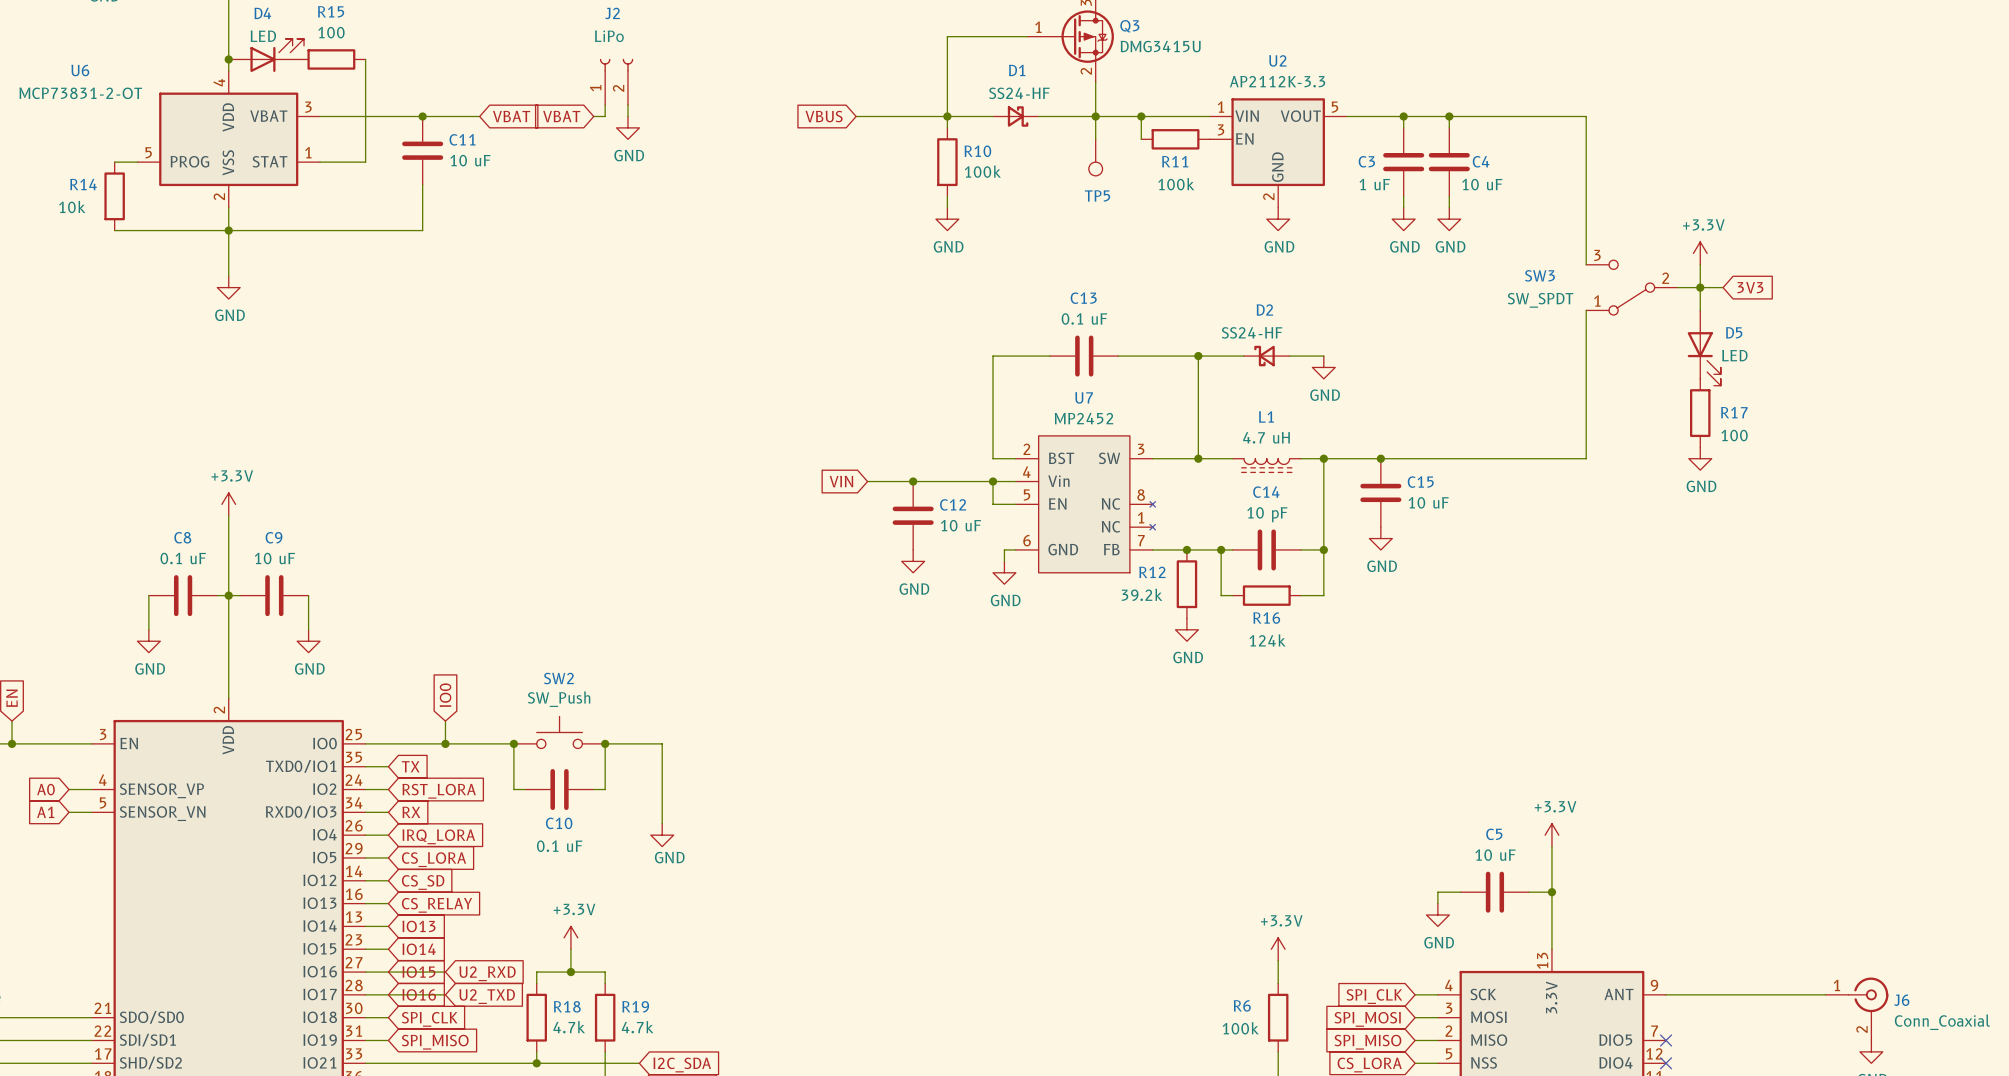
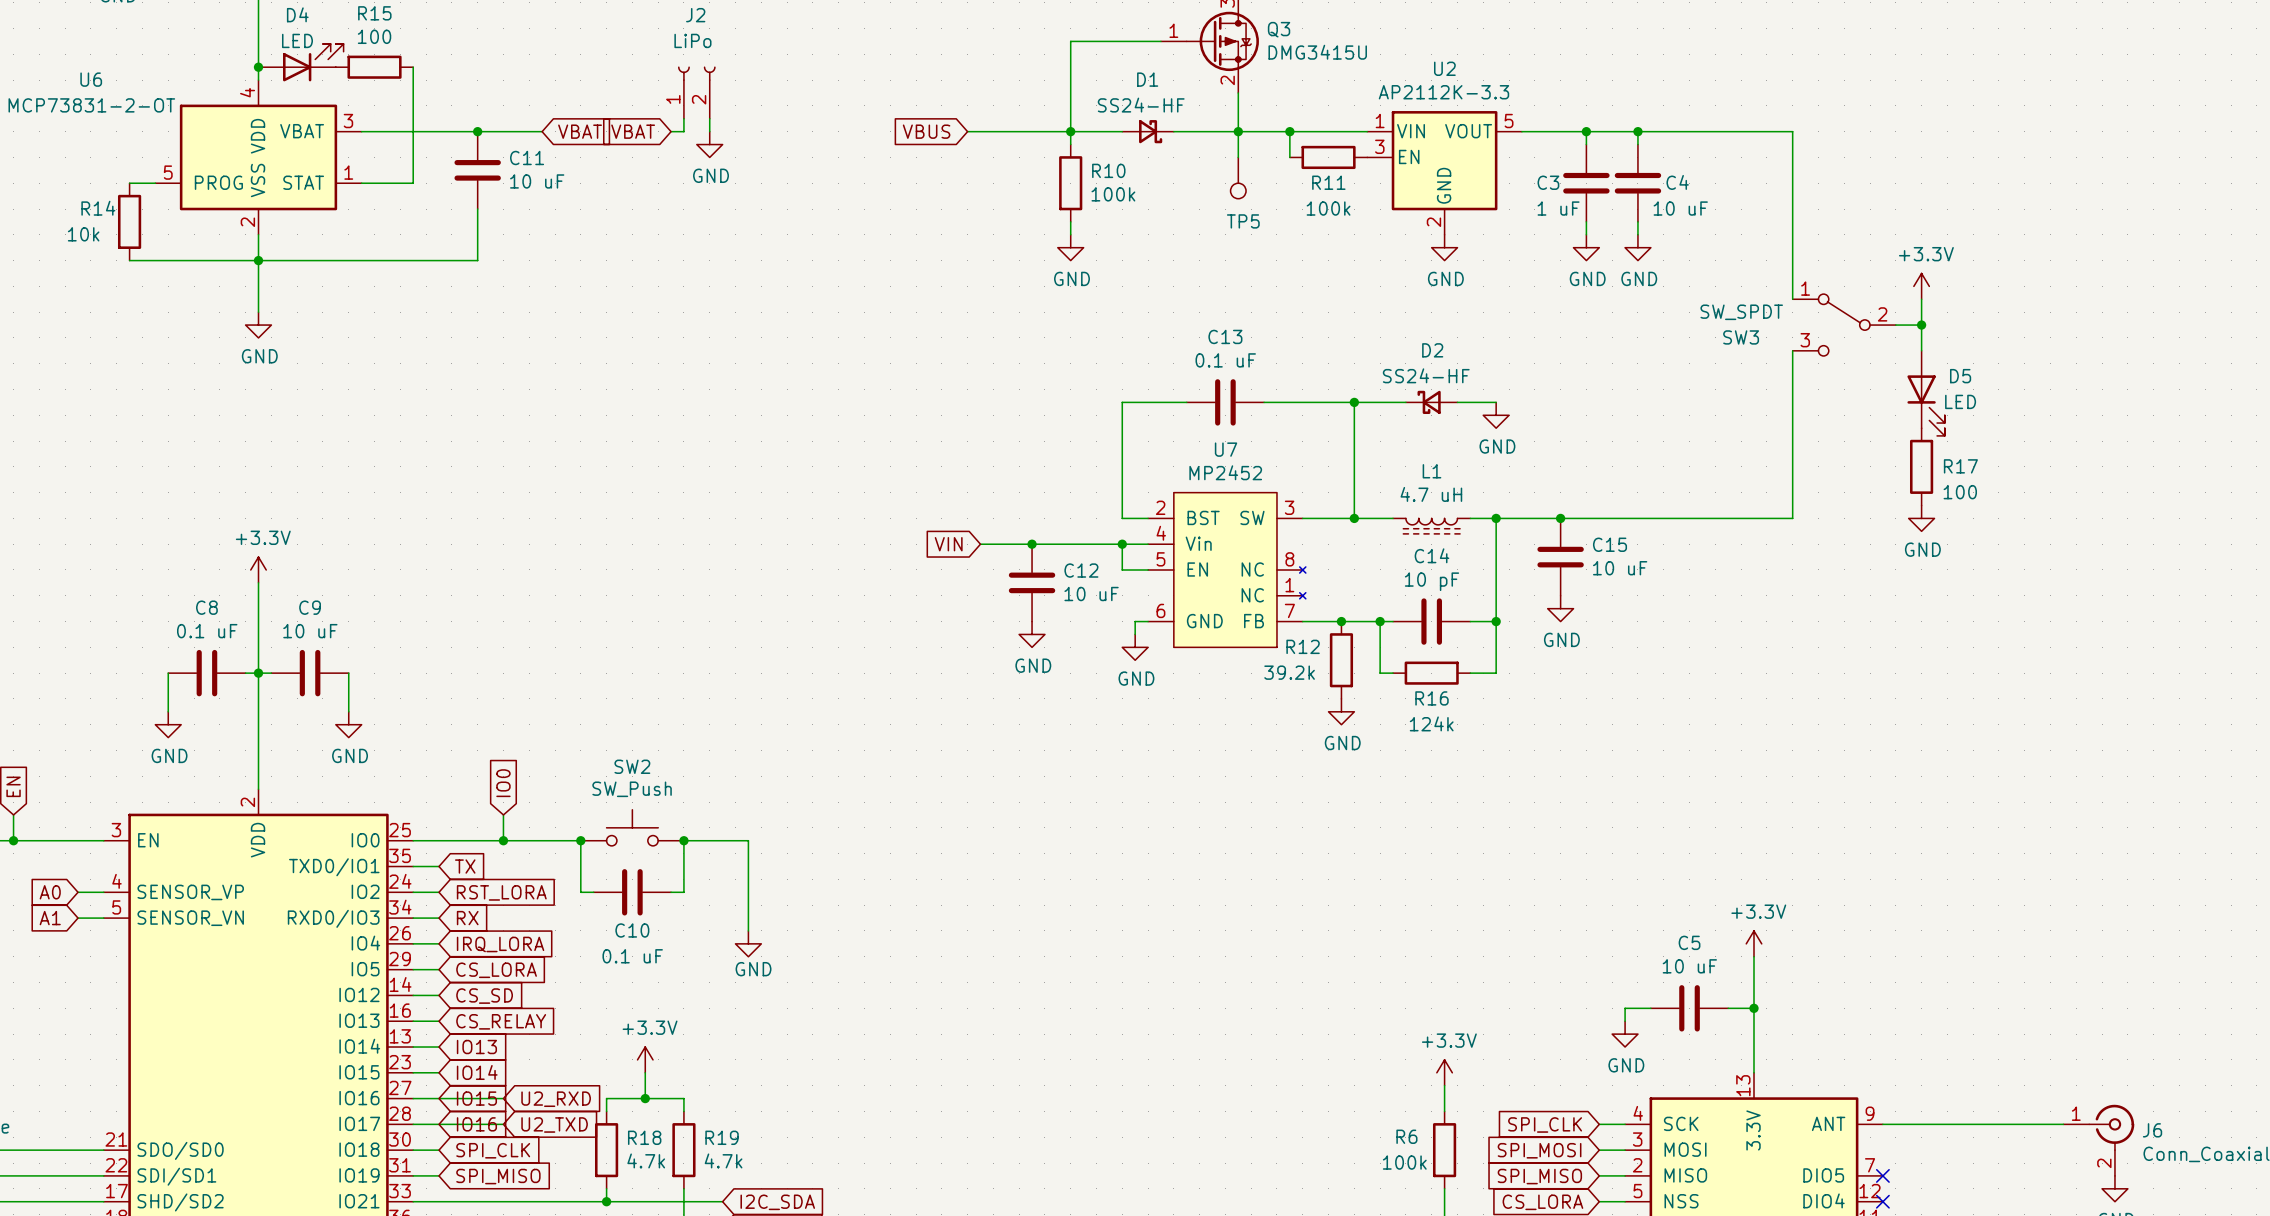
SW3 flip: as is (1631, 287) -> up-down (1844, 325)
wire: (1700, 287) (1723, 287) -> none
global label: 3V3 (1750, 287) -> none

